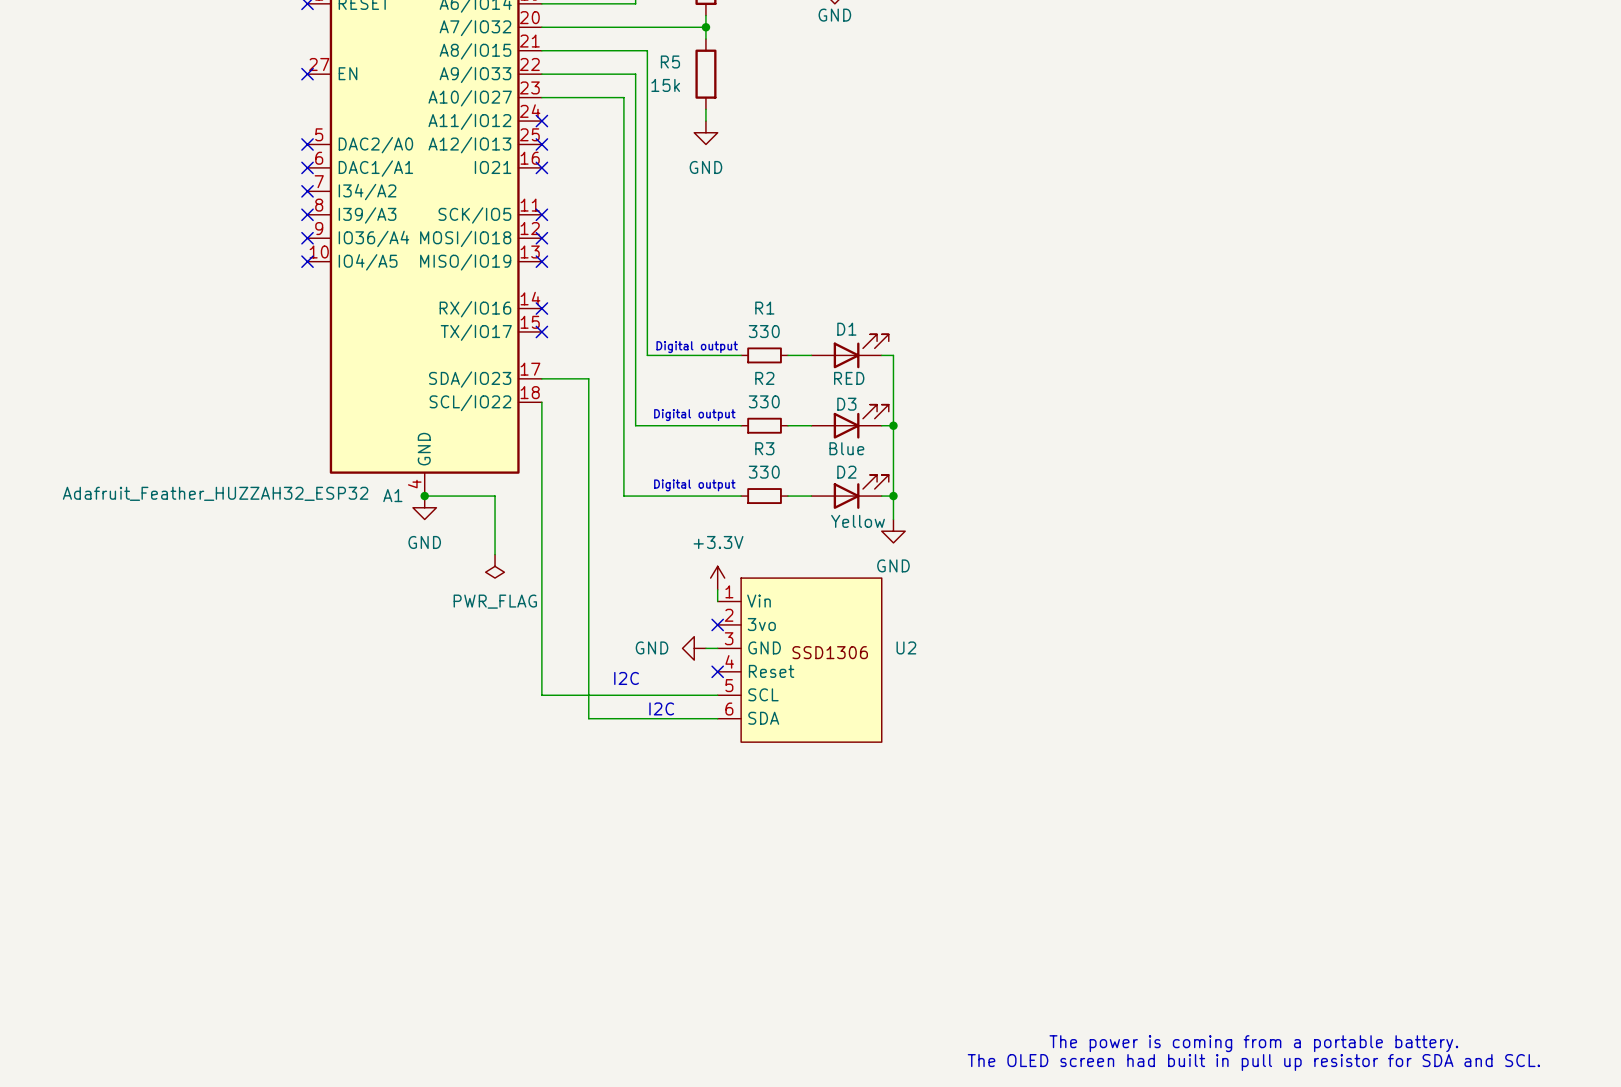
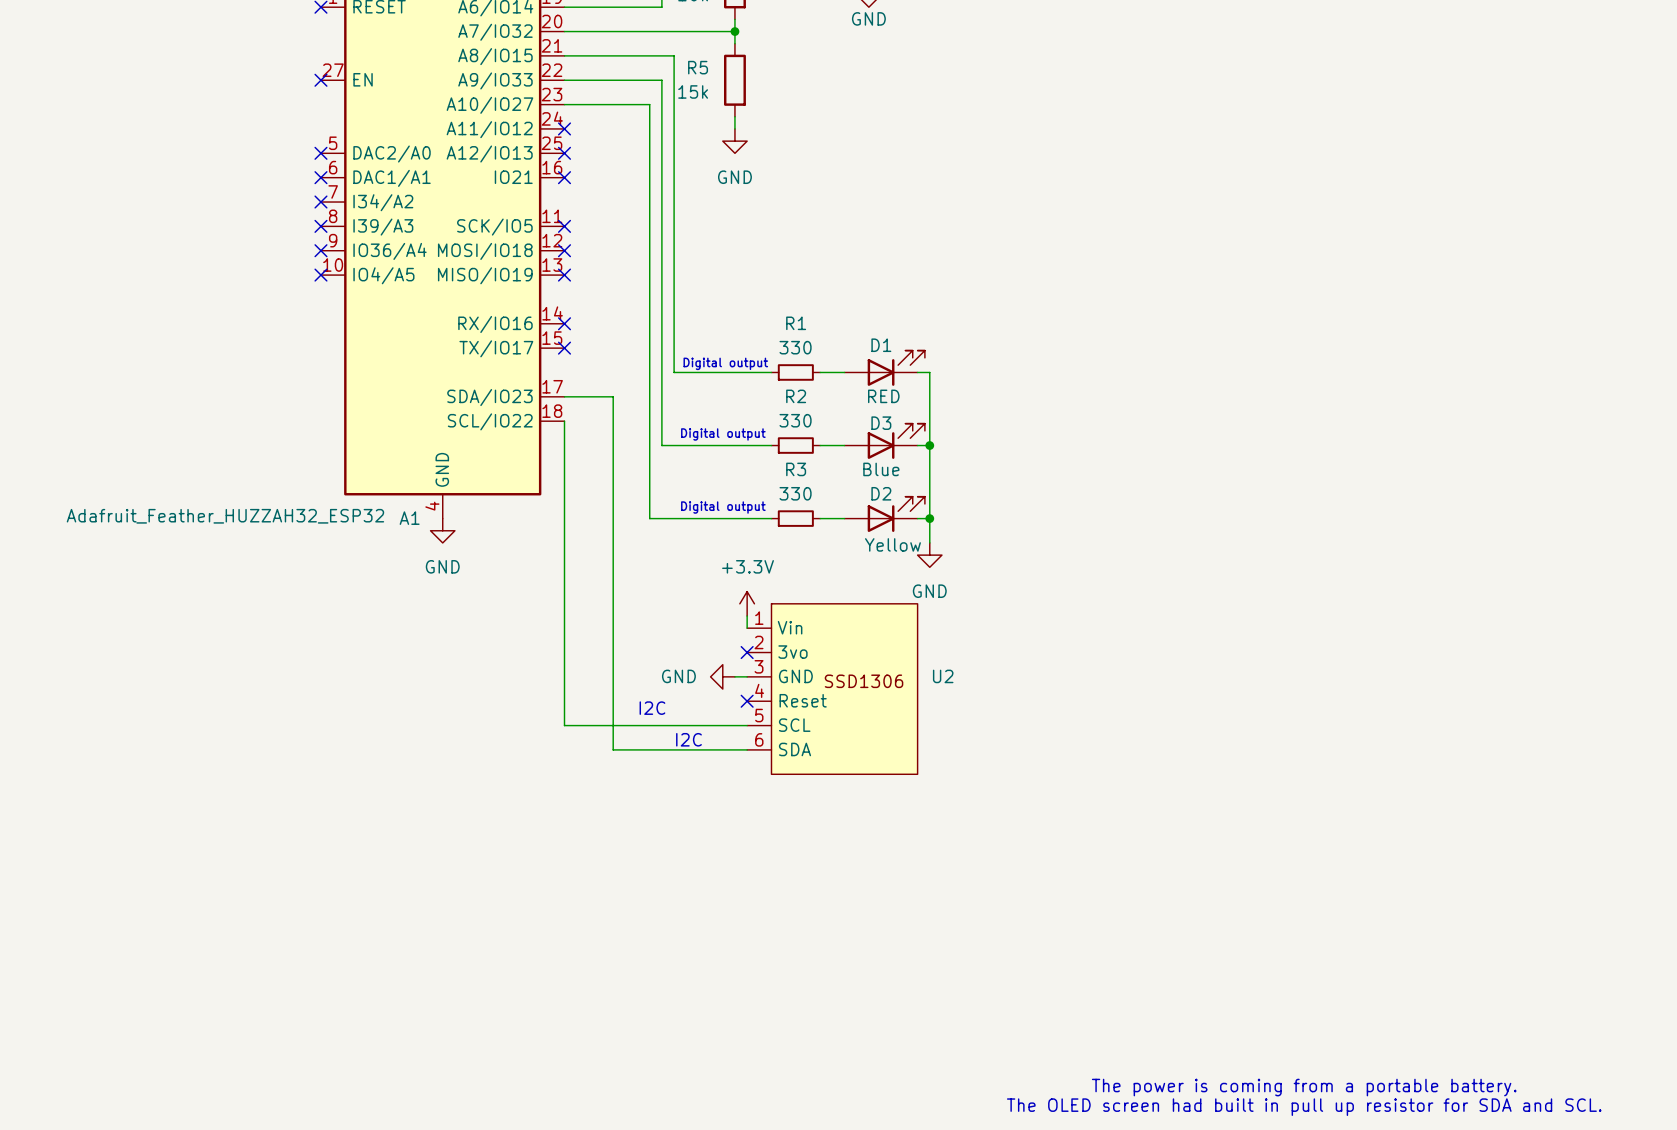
wire: (424, 496) (495, 496) (495, 554) -> none
junction: (424, 496) -> none
power symbol: PWR_FLAG (495, 566) -> none

